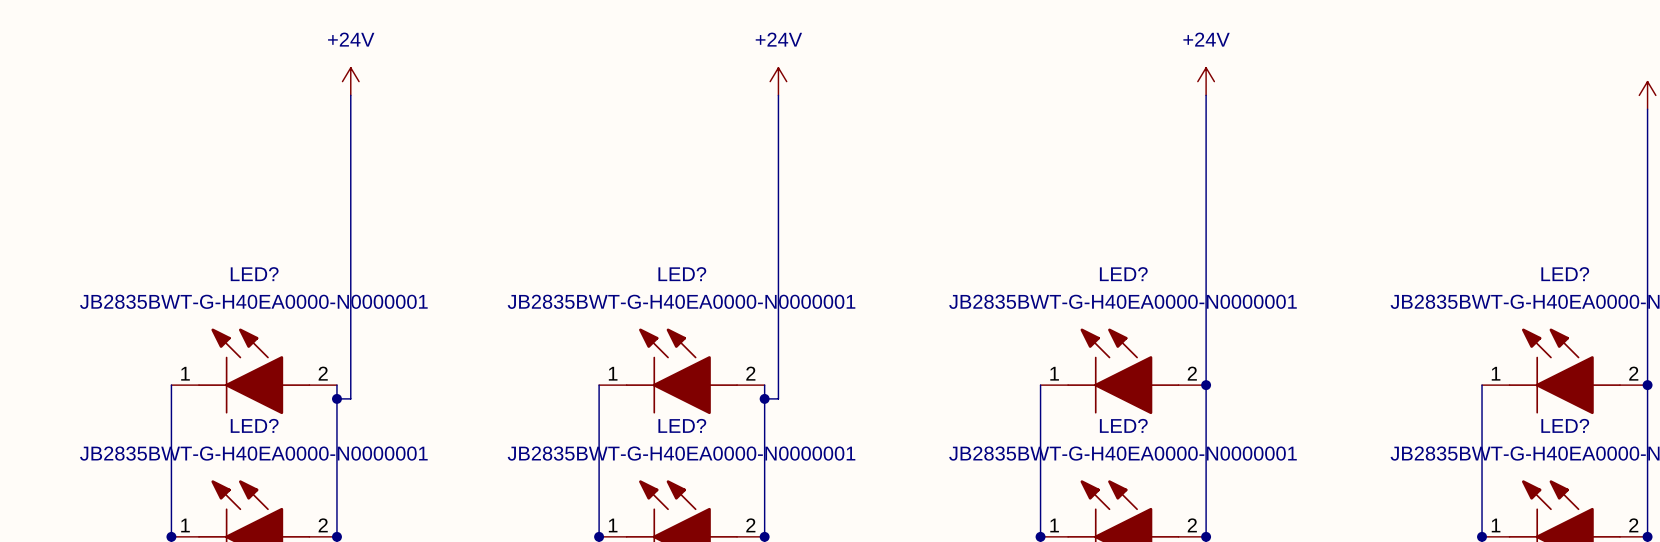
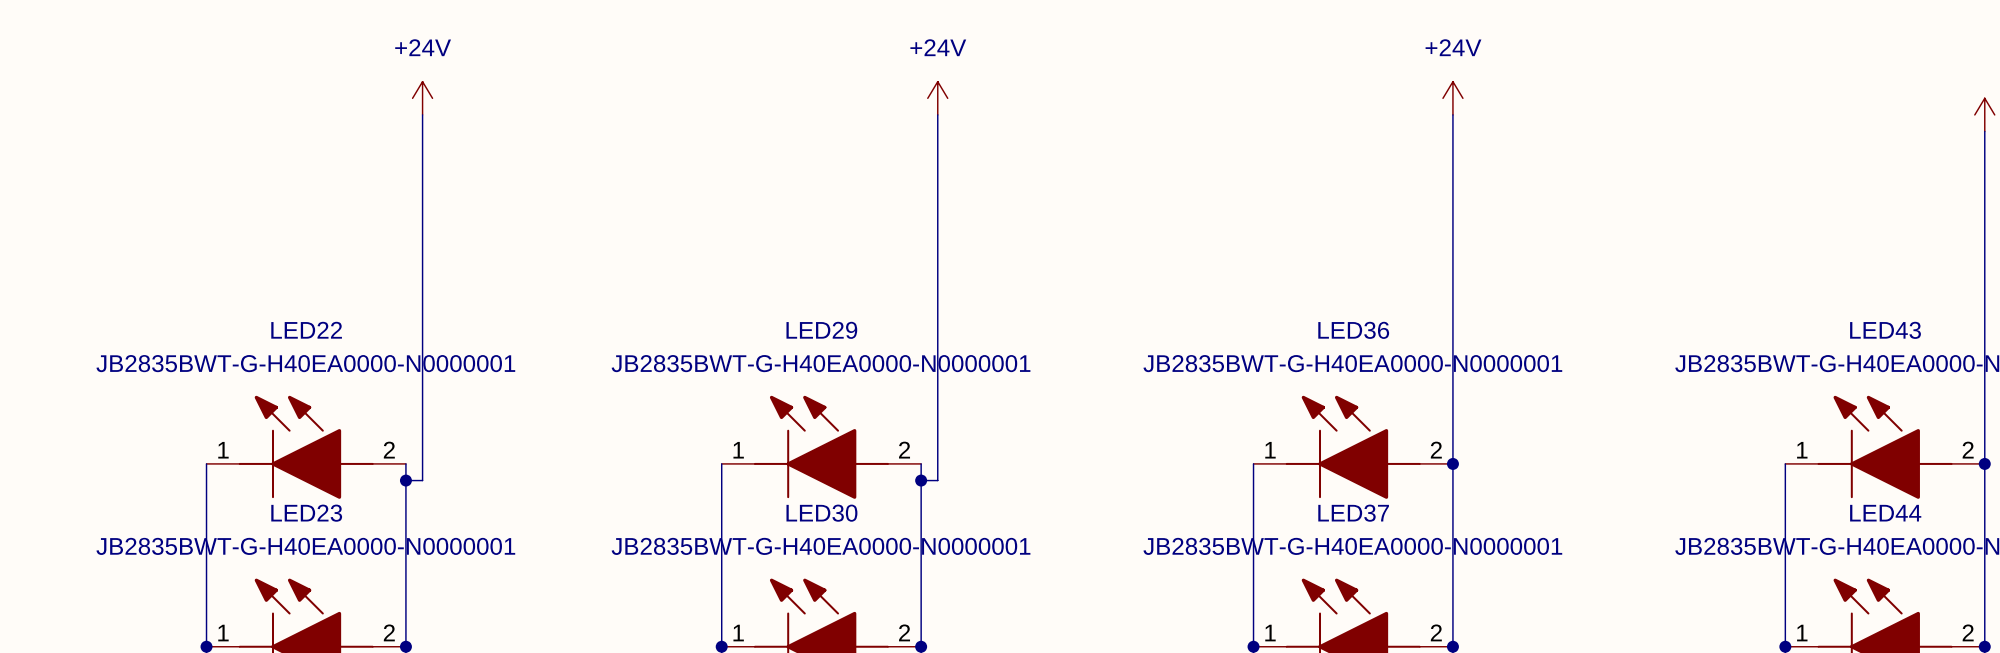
LED? name: LED? (254, 274) -> LED22 (306, 330)
LED? name: LED? (682, 274) -> LED29 (821, 330)
LED? name: LED? (1123, 274) -> LED36 (1353, 330)
LED? name: LED? (1565, 274) -> LED43 (1885, 330)
LED? name: LED? (254, 425) -> LED23 (306, 513)
LED? name: LED? (682, 425) -> LED30 (821, 513)
LED? name: LED? (1123, 425) -> LED37 (1353, 513)
LED? name: LED? (1565, 425) -> LED44 (1885, 513)

